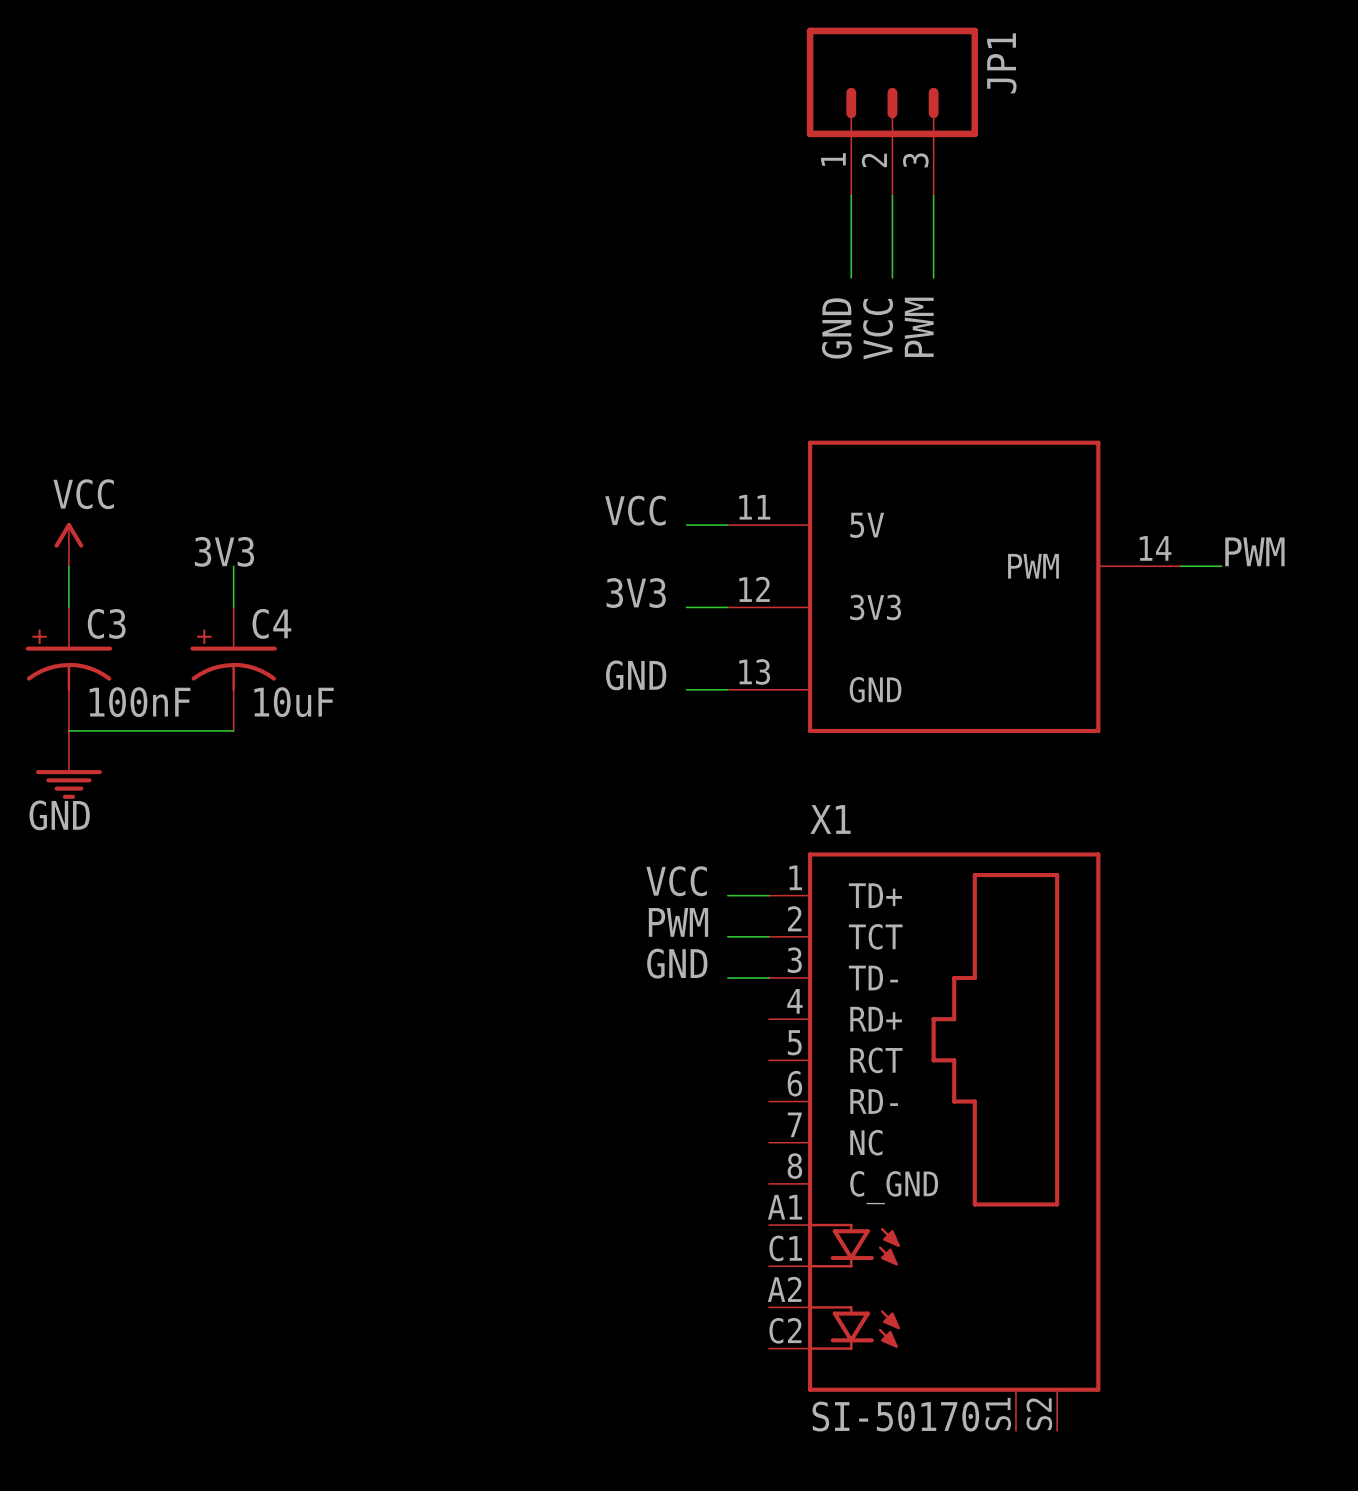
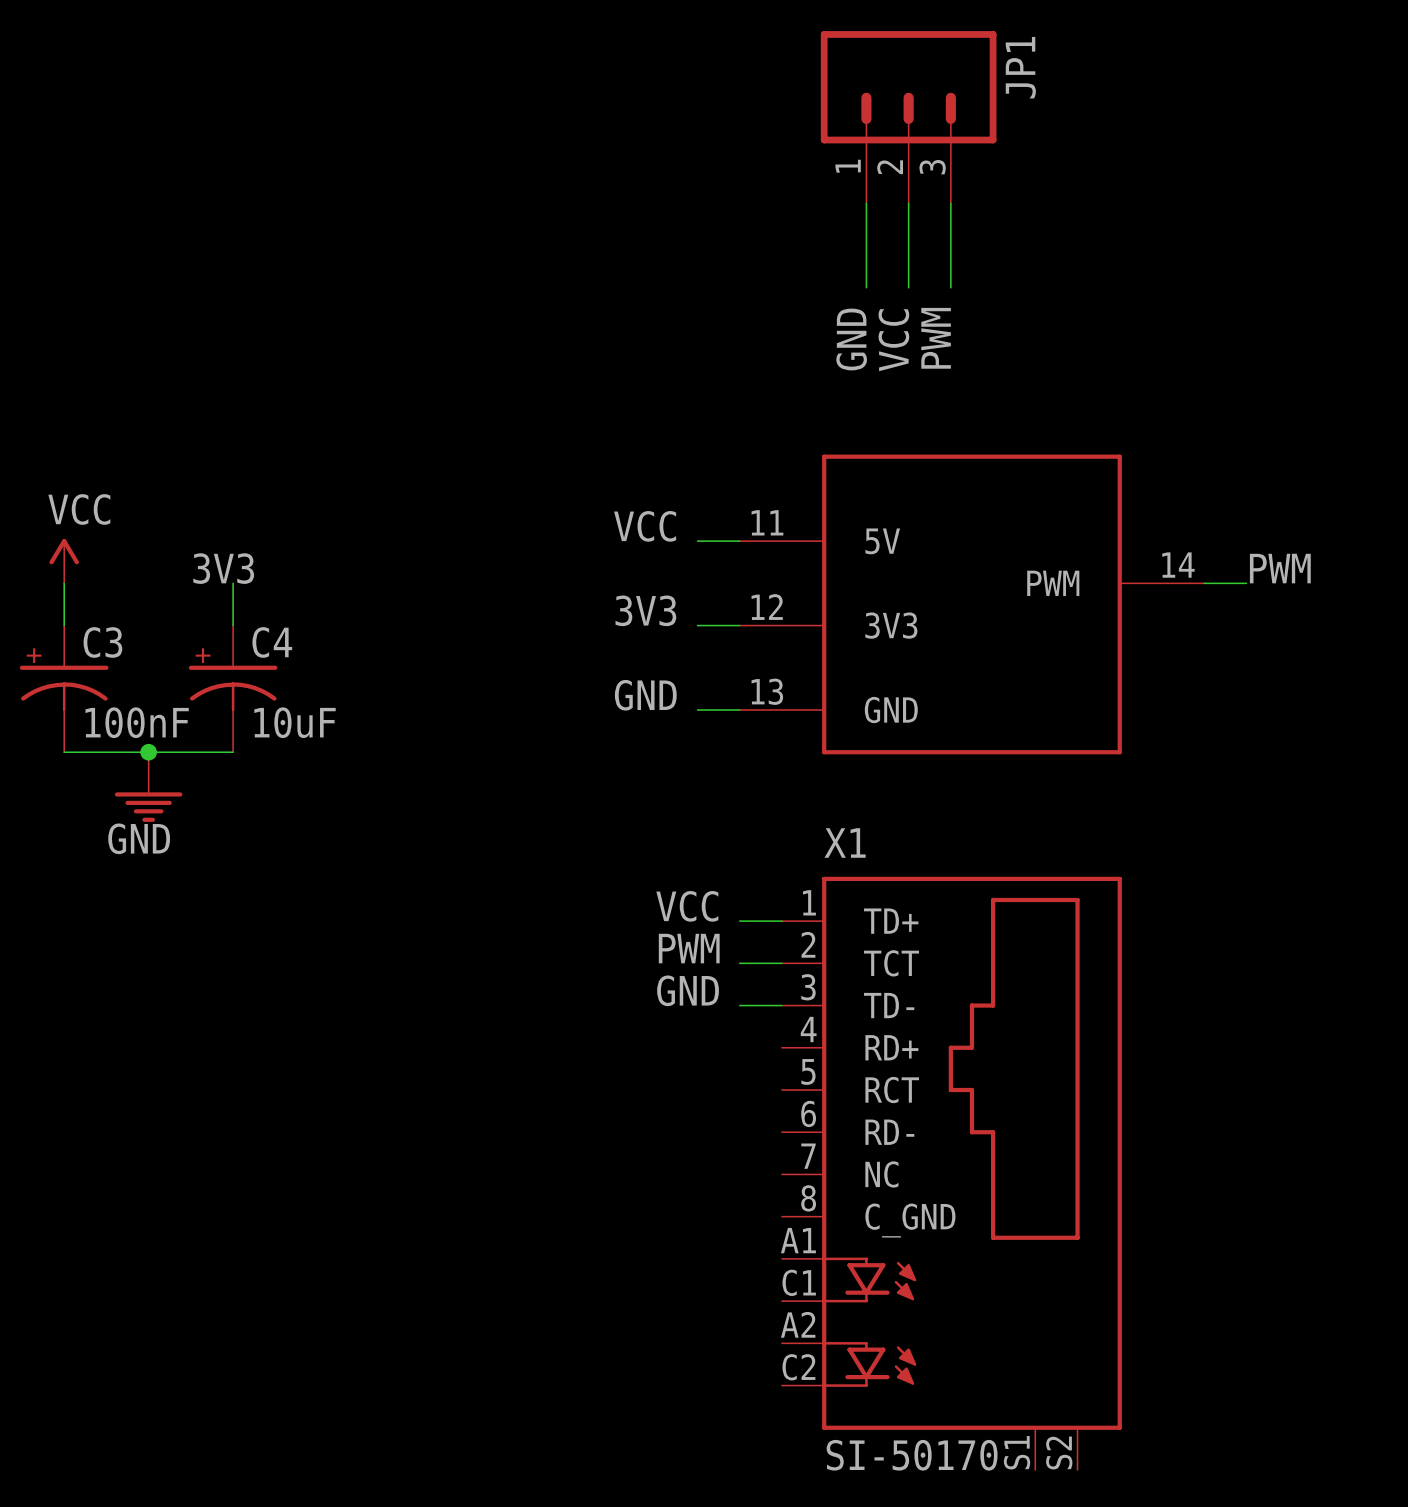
junction: none -> (148, 752)
power symbol position: GND (68, 764) -> GND (148, 787)

